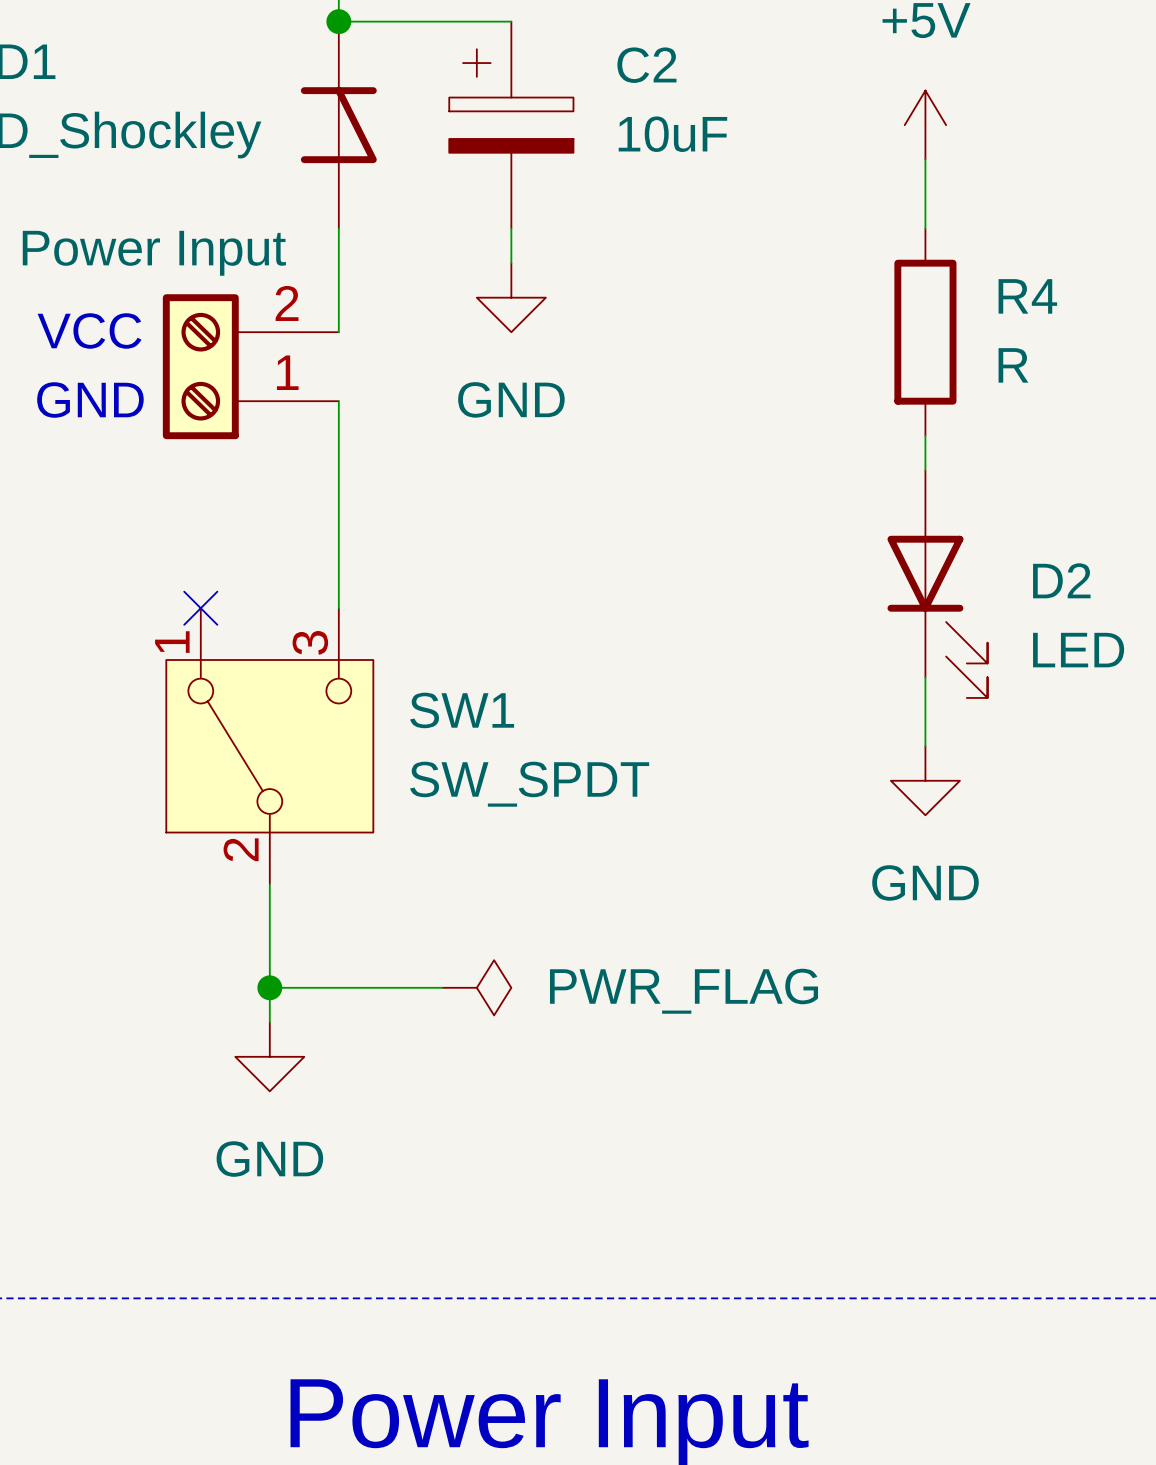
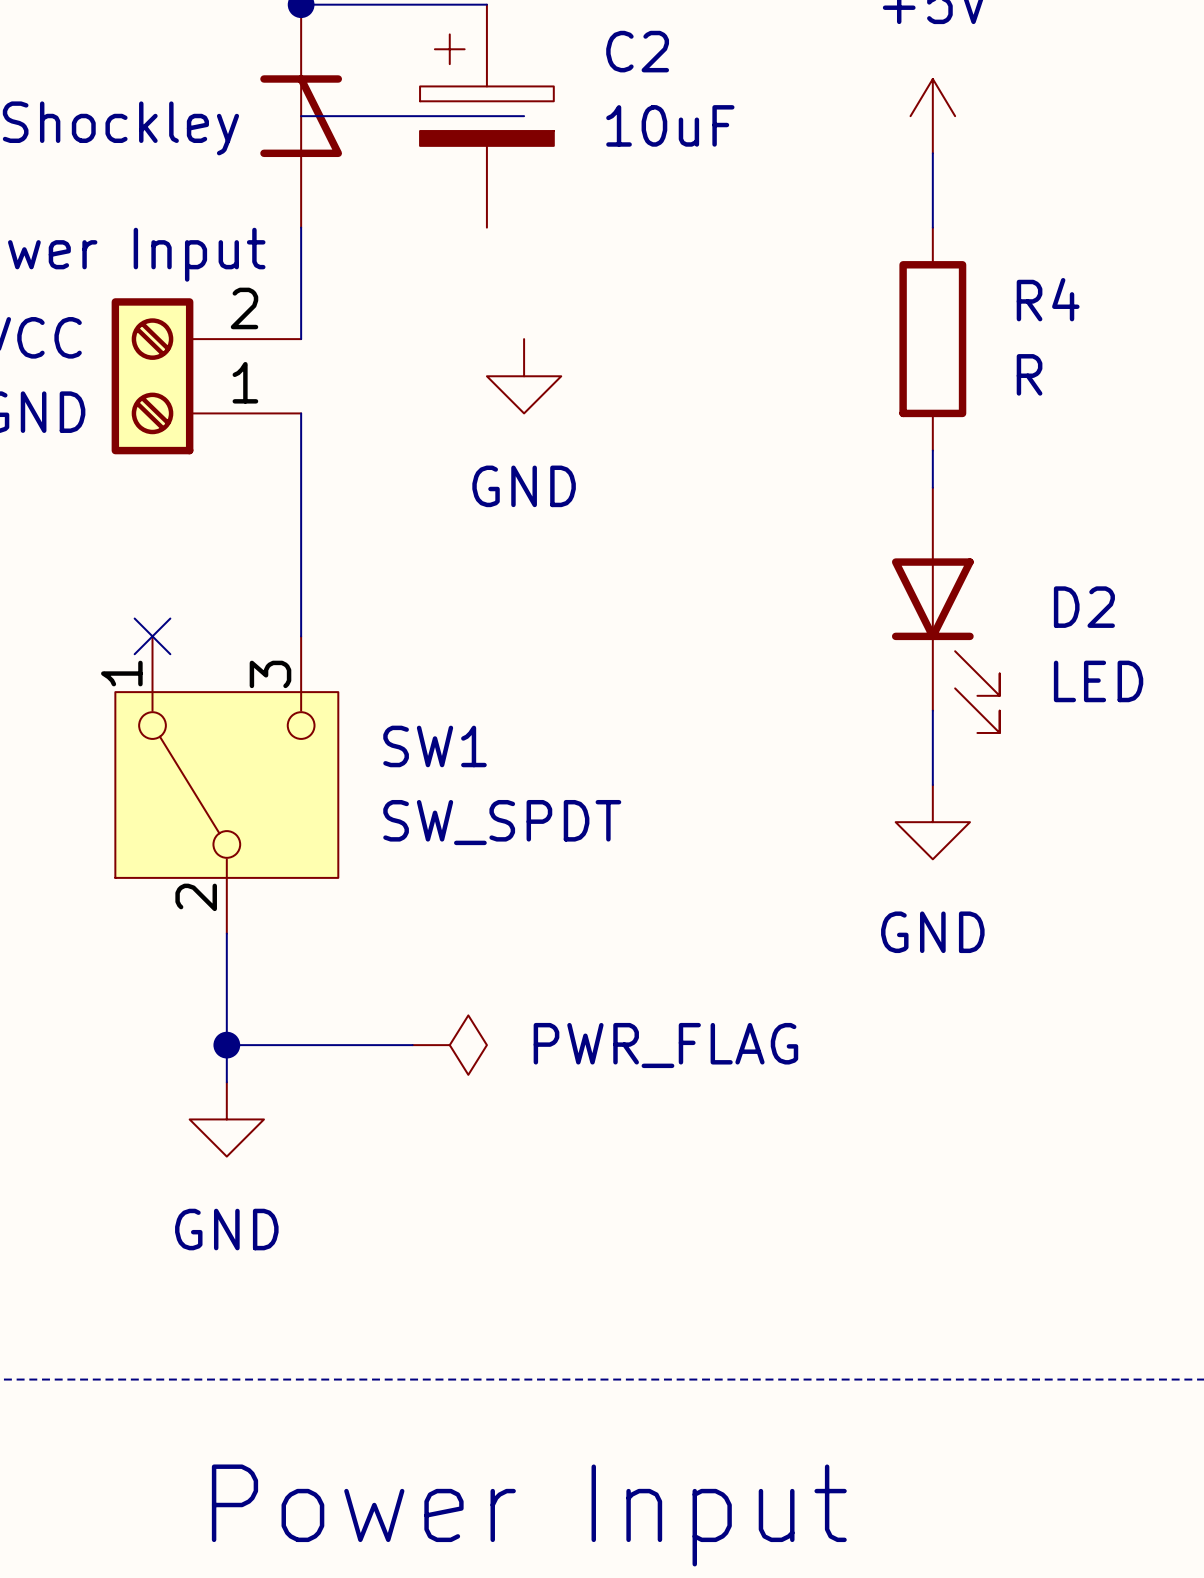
wire: none -> (301, 116) (524, 116)
wire: (511, 228) (511, 263) -> none
power symbol position: GND (511, 297) -> GND (524, 376)

